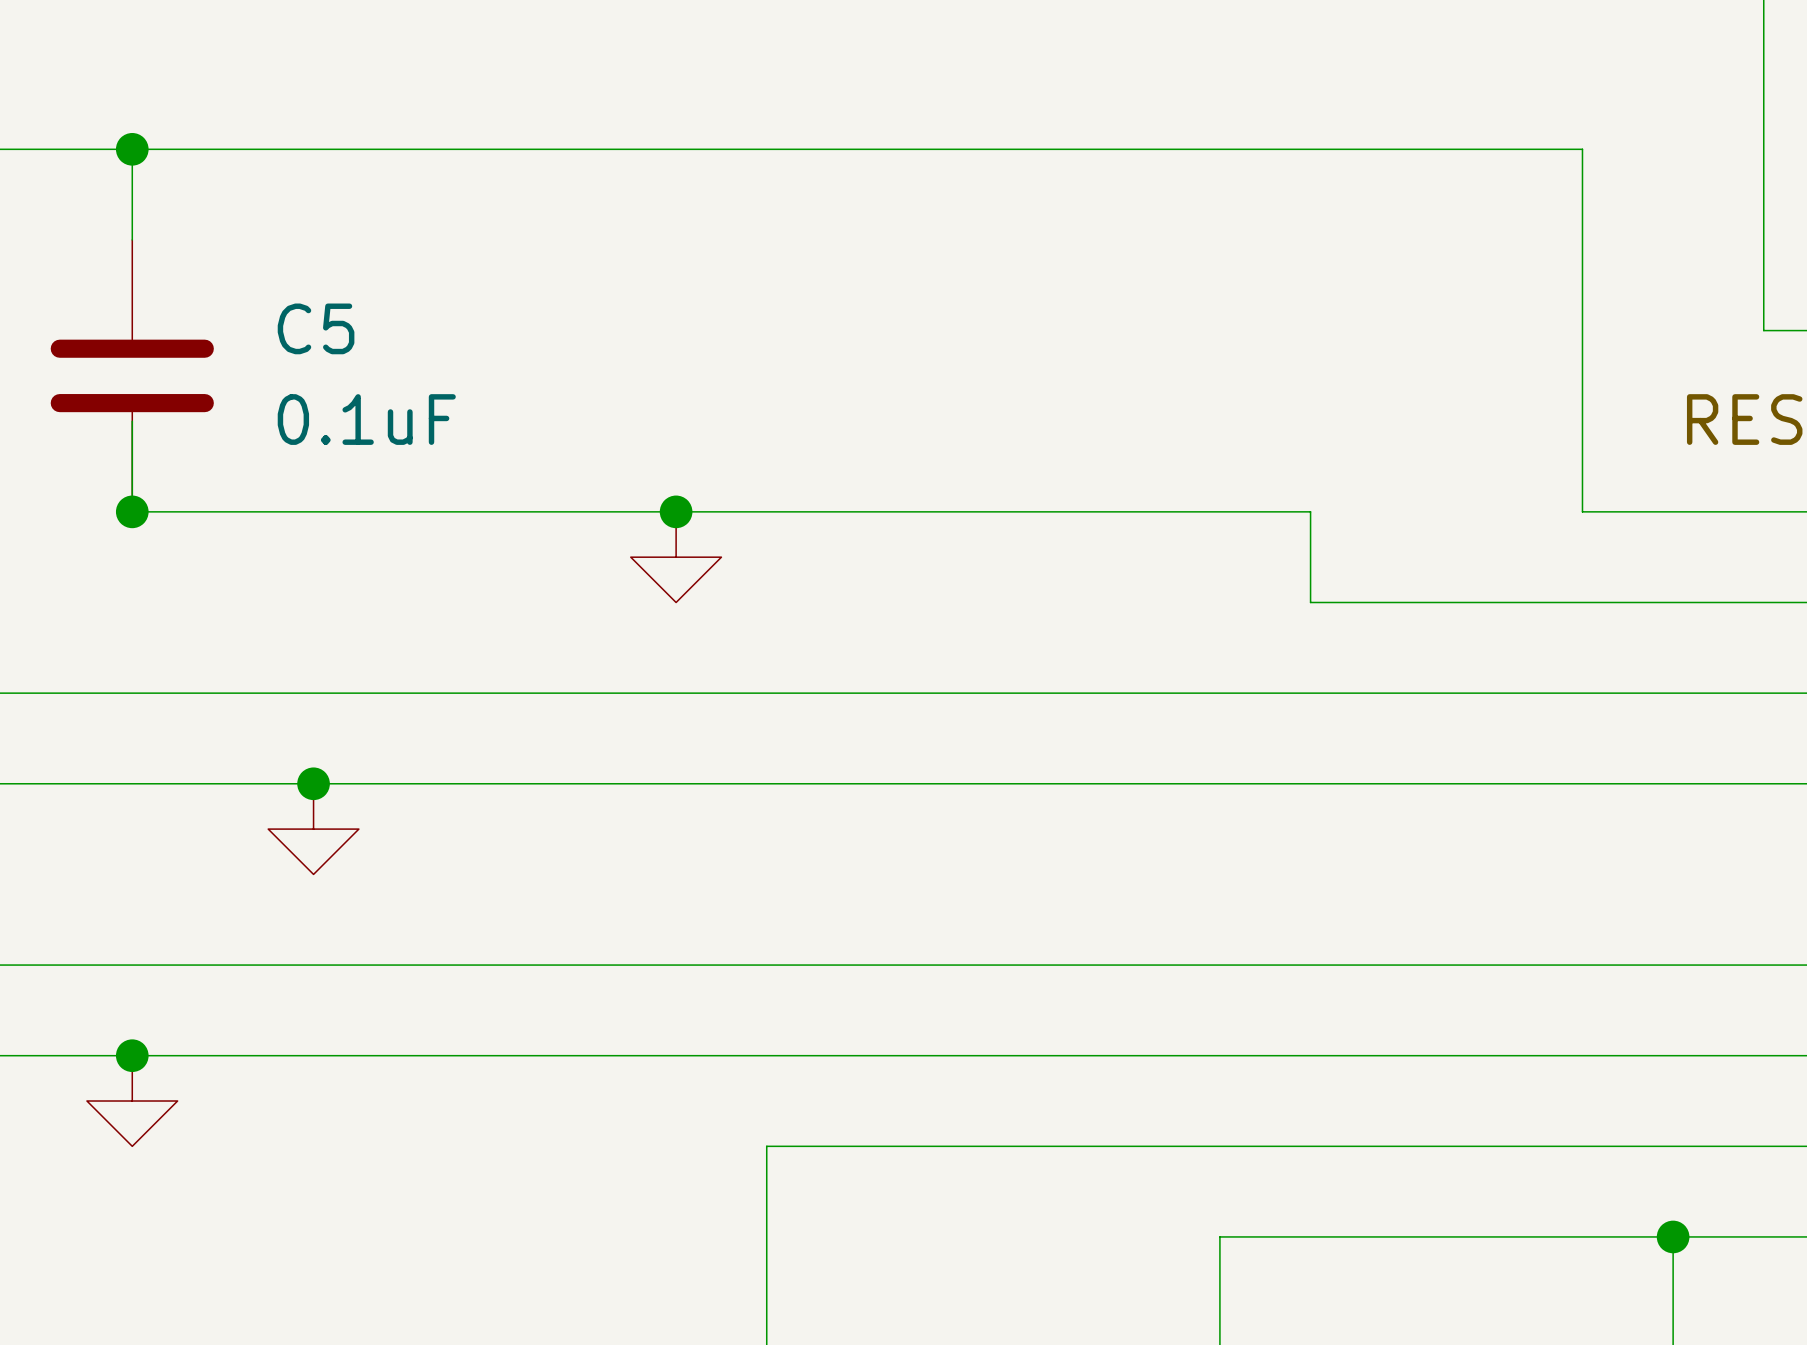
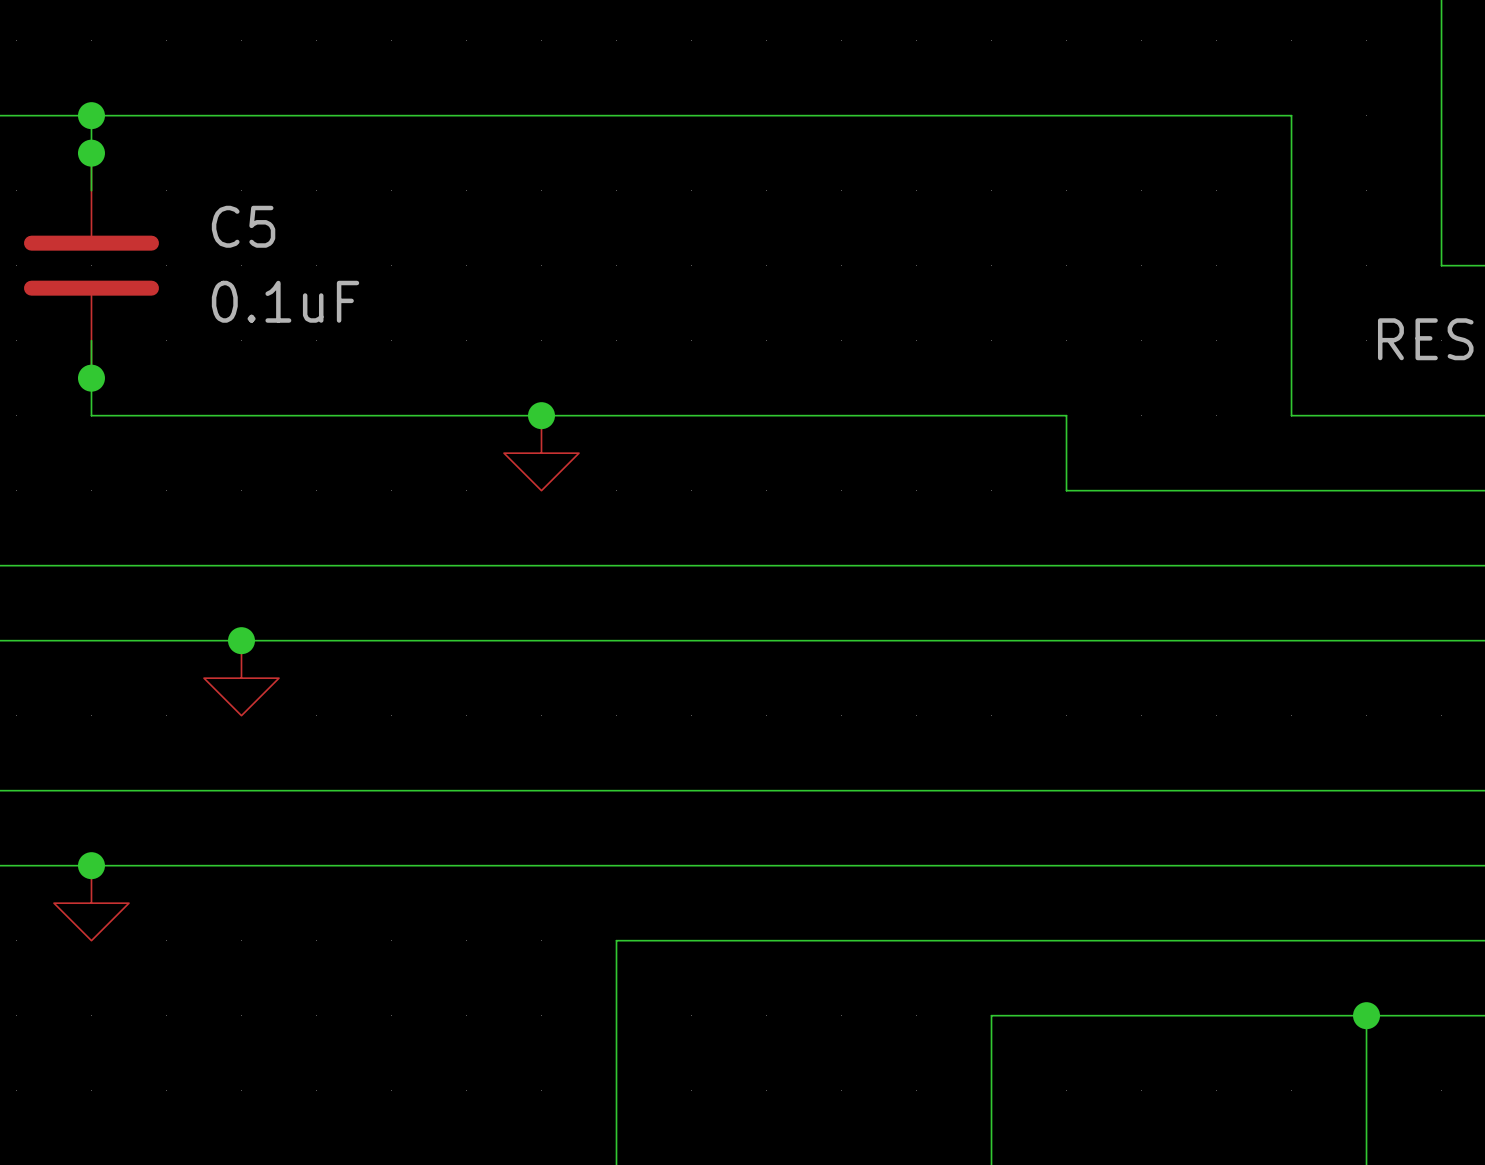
junction: none -> (91, 153)
C5 position: (132, 375) -> (91, 265)
junction position: (132, 511) -> (91, 378)

